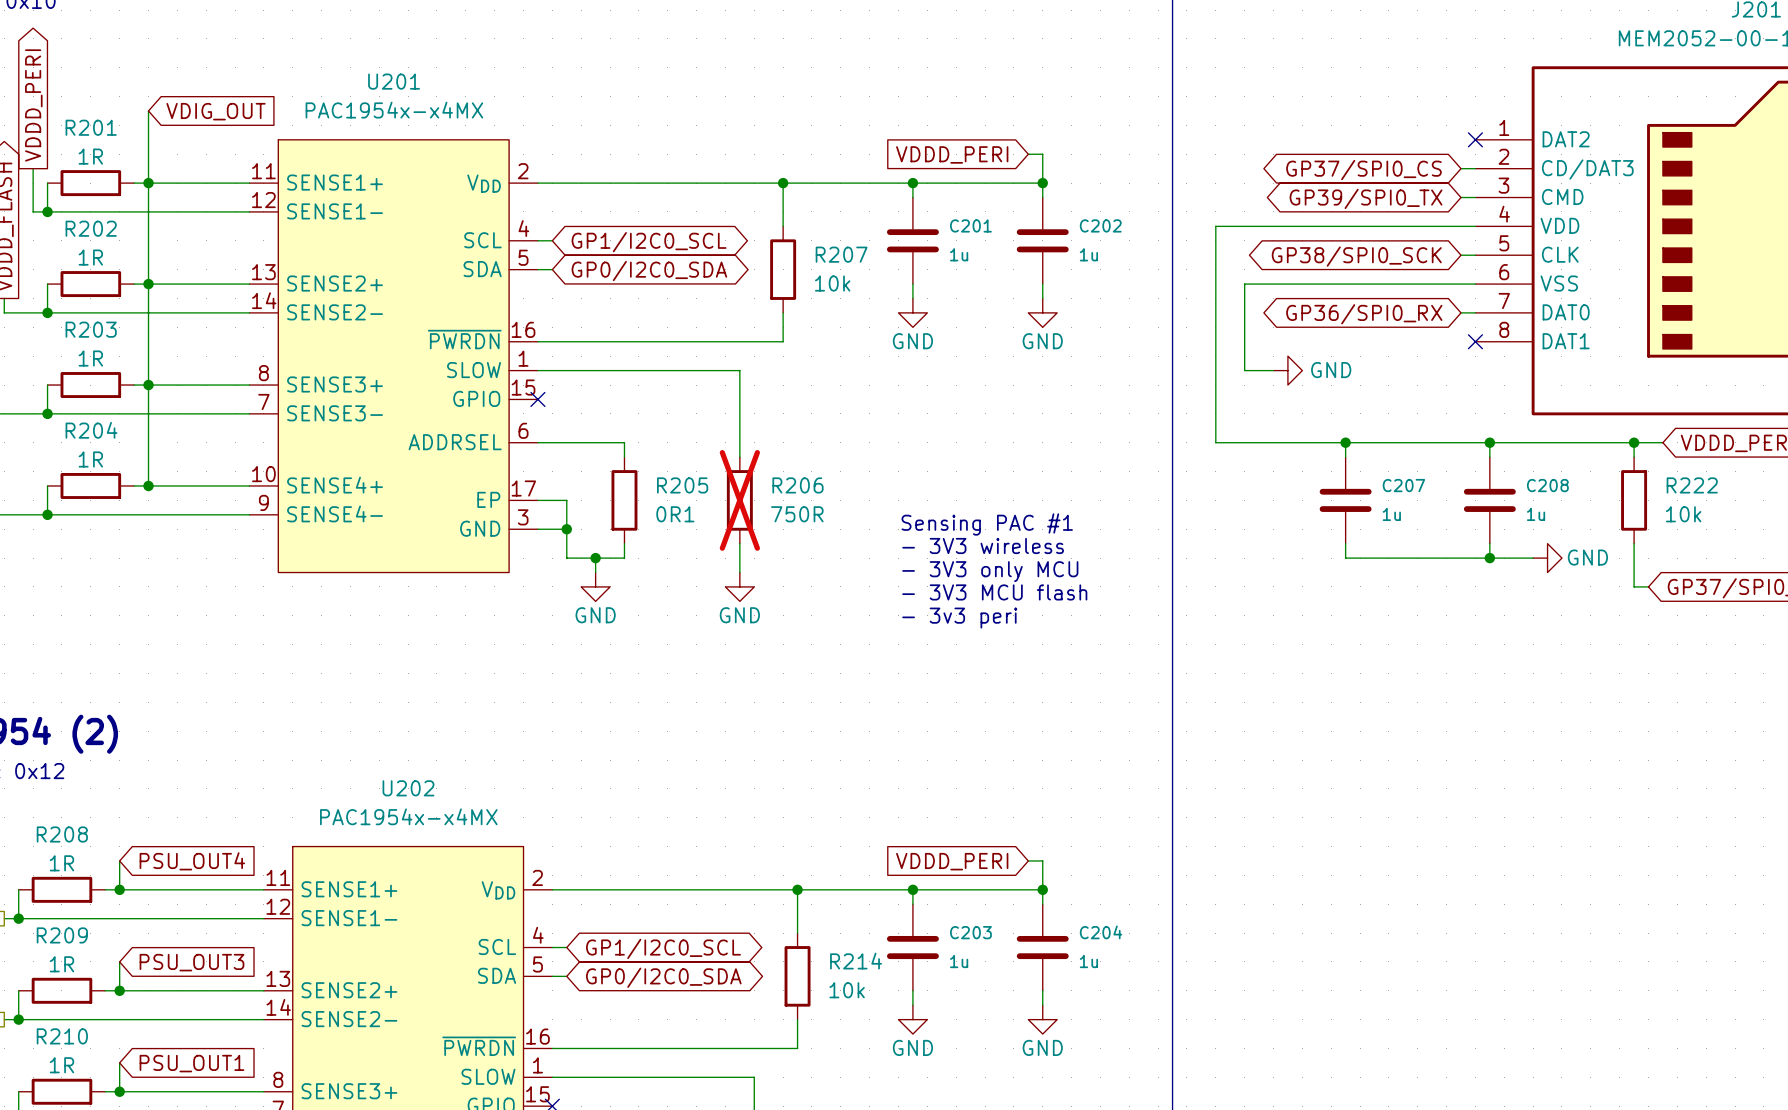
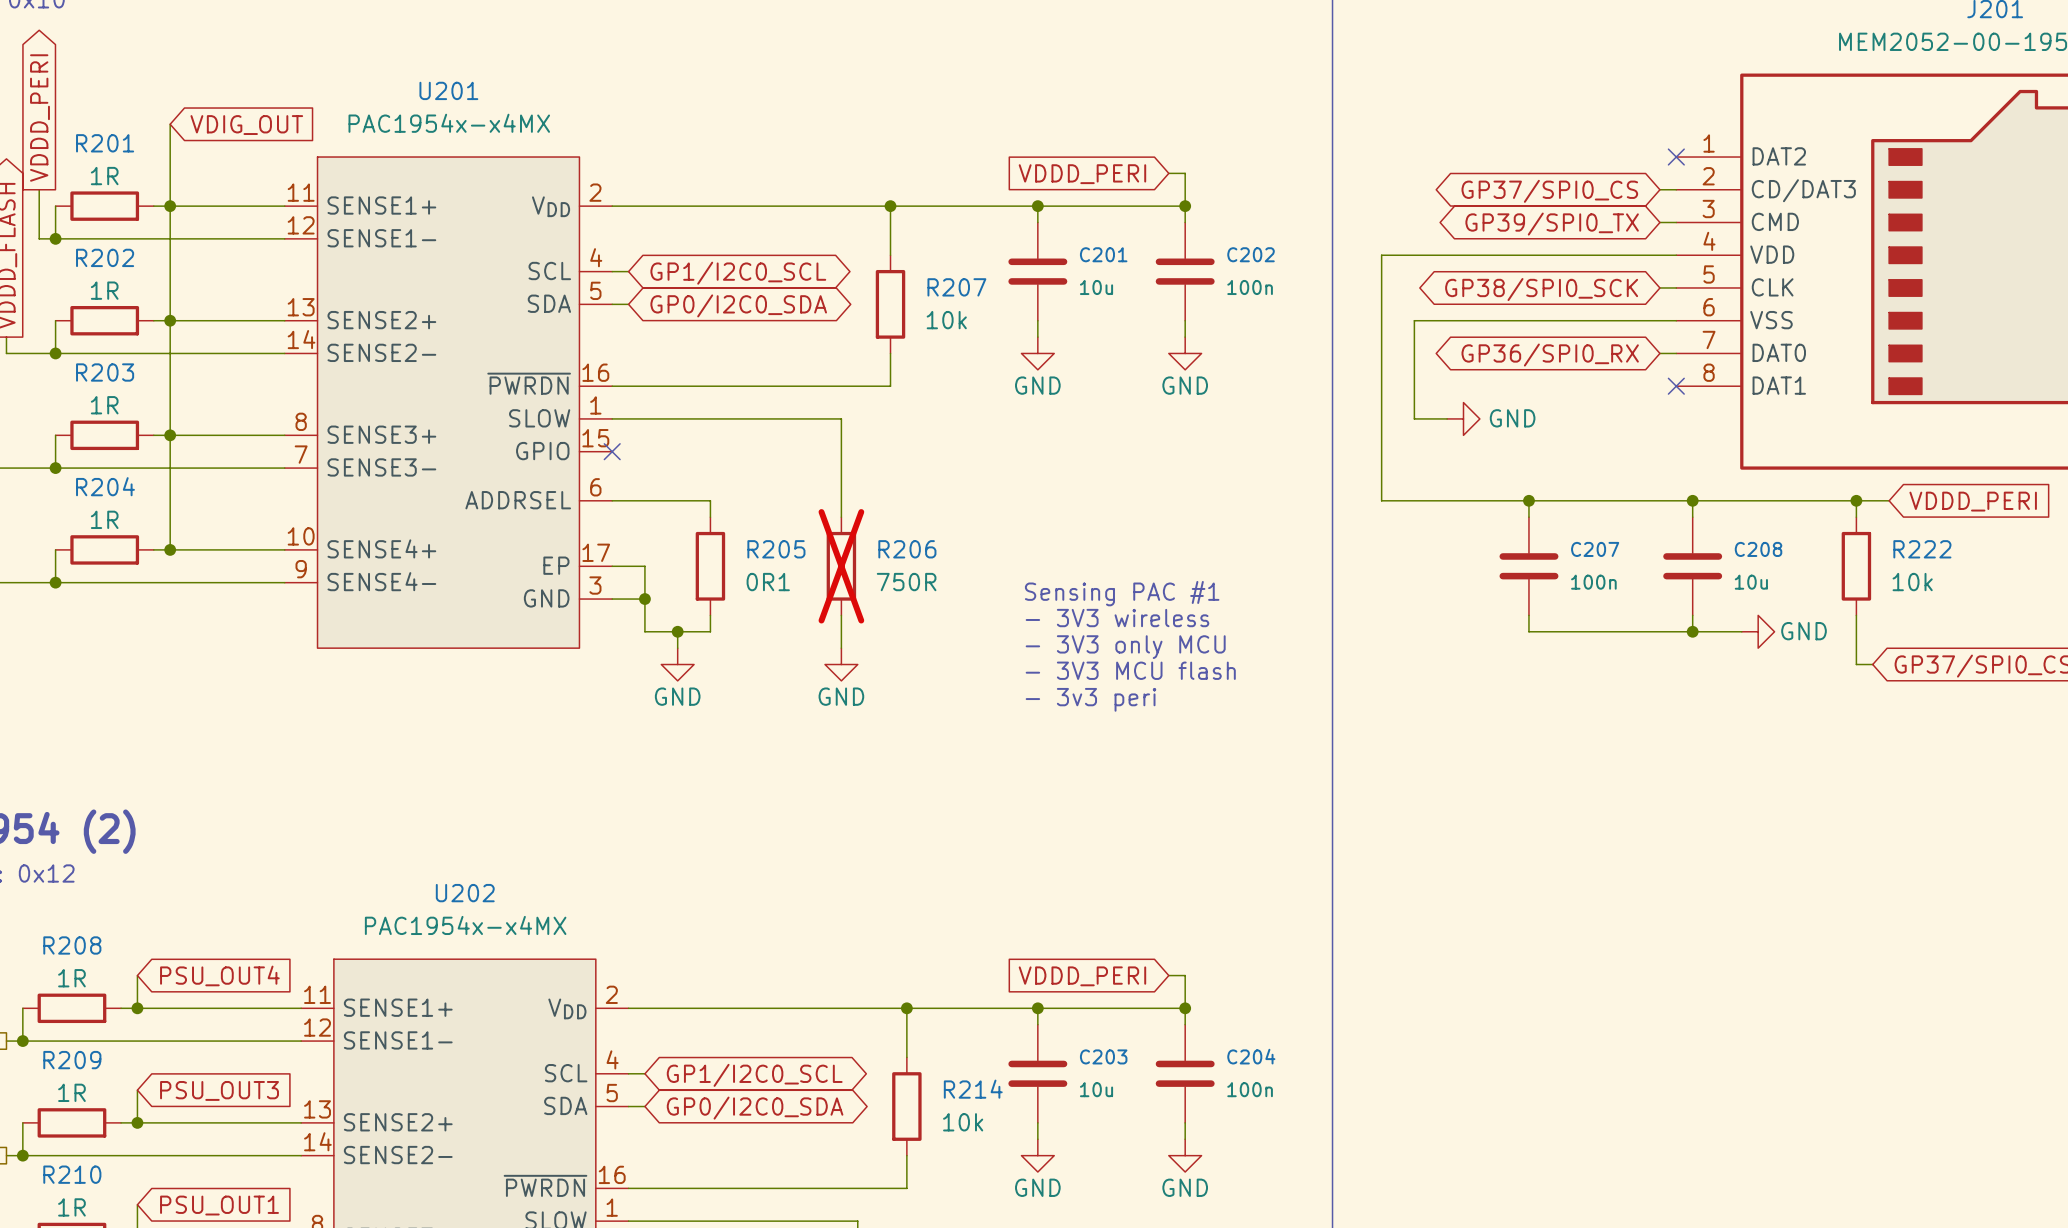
C201 value: 1u (959, 254) -> 10u (1096, 287)
C202 value: 1u (1088, 254) -> 100n (1250, 287)
C207 value: 1u (1391, 514) -> 100n (1593, 582)
C208 value: 1u (1536, 514) -> 10u (1751, 582)
C203 value: 1u (959, 961) -> 10u (1096, 1089)
C204 value: 1u (1088, 961) -> 100n (1250, 1089)

